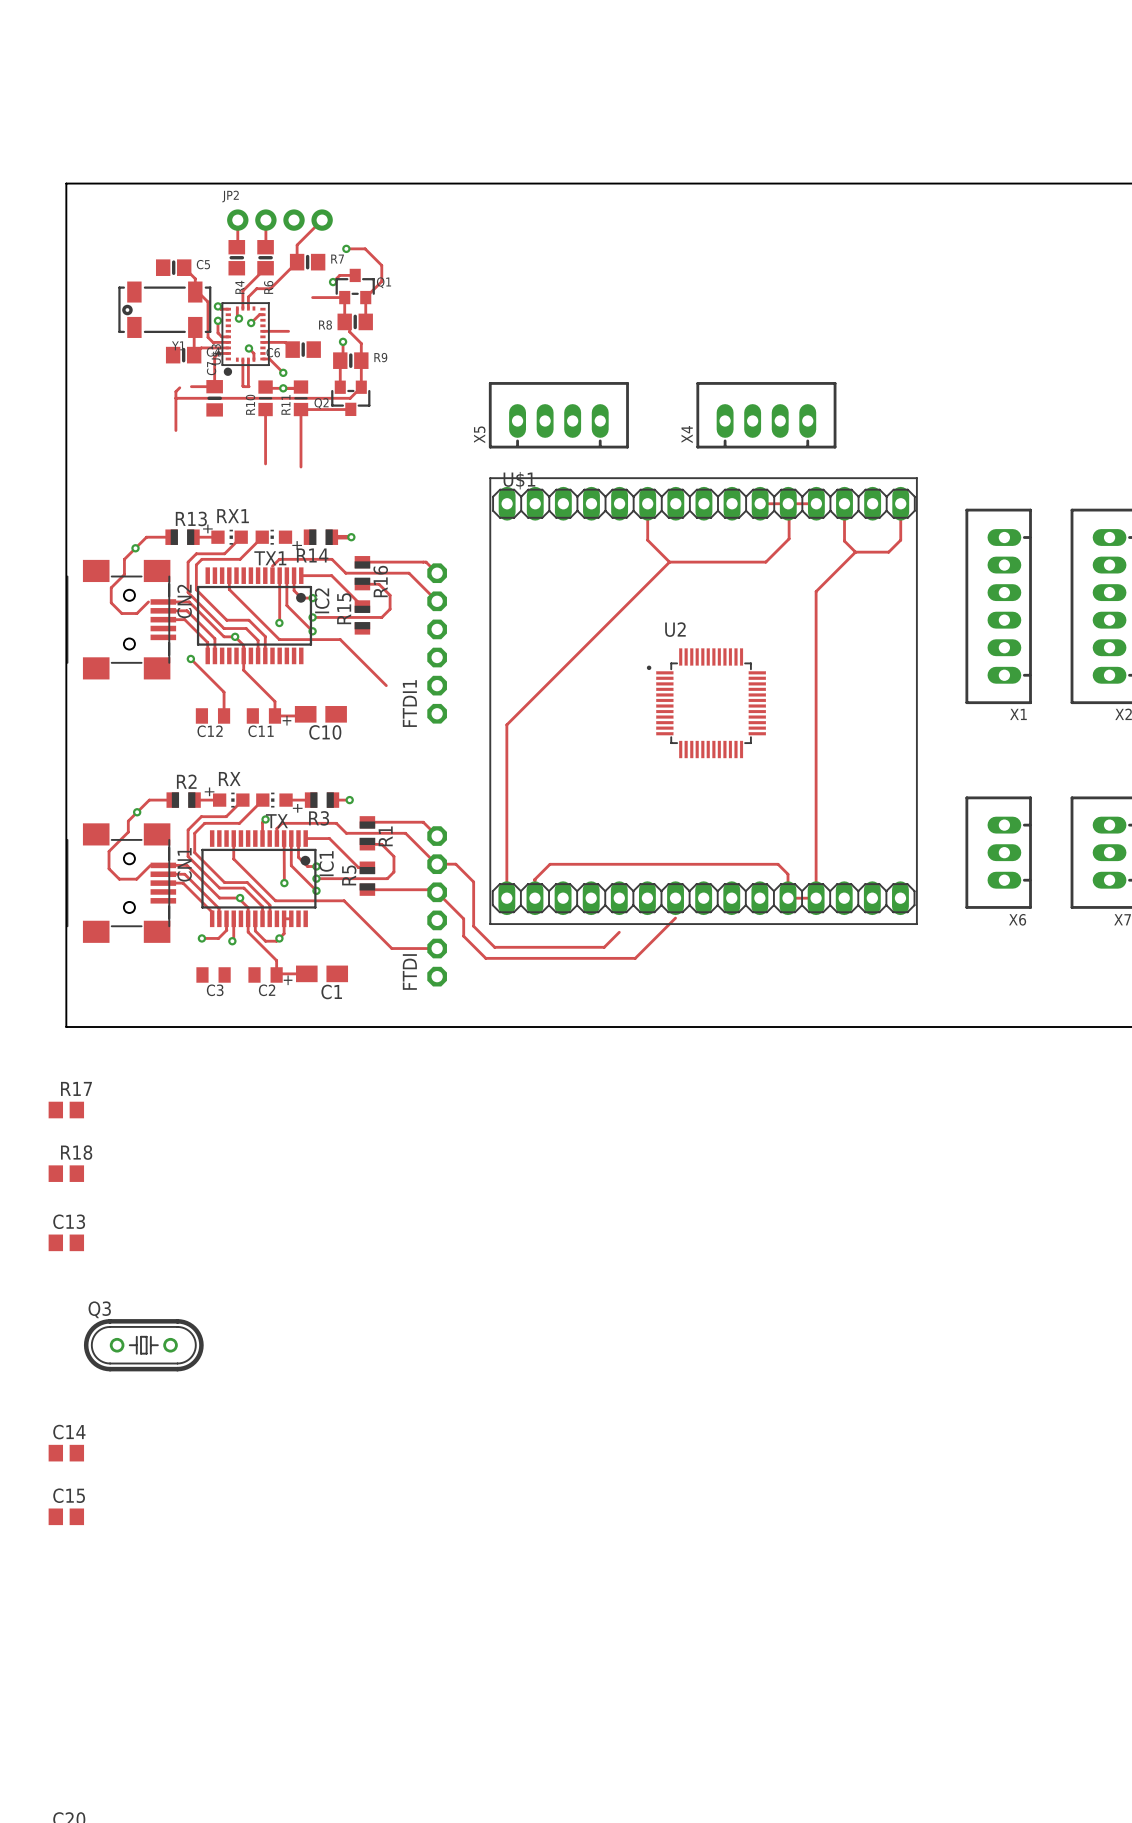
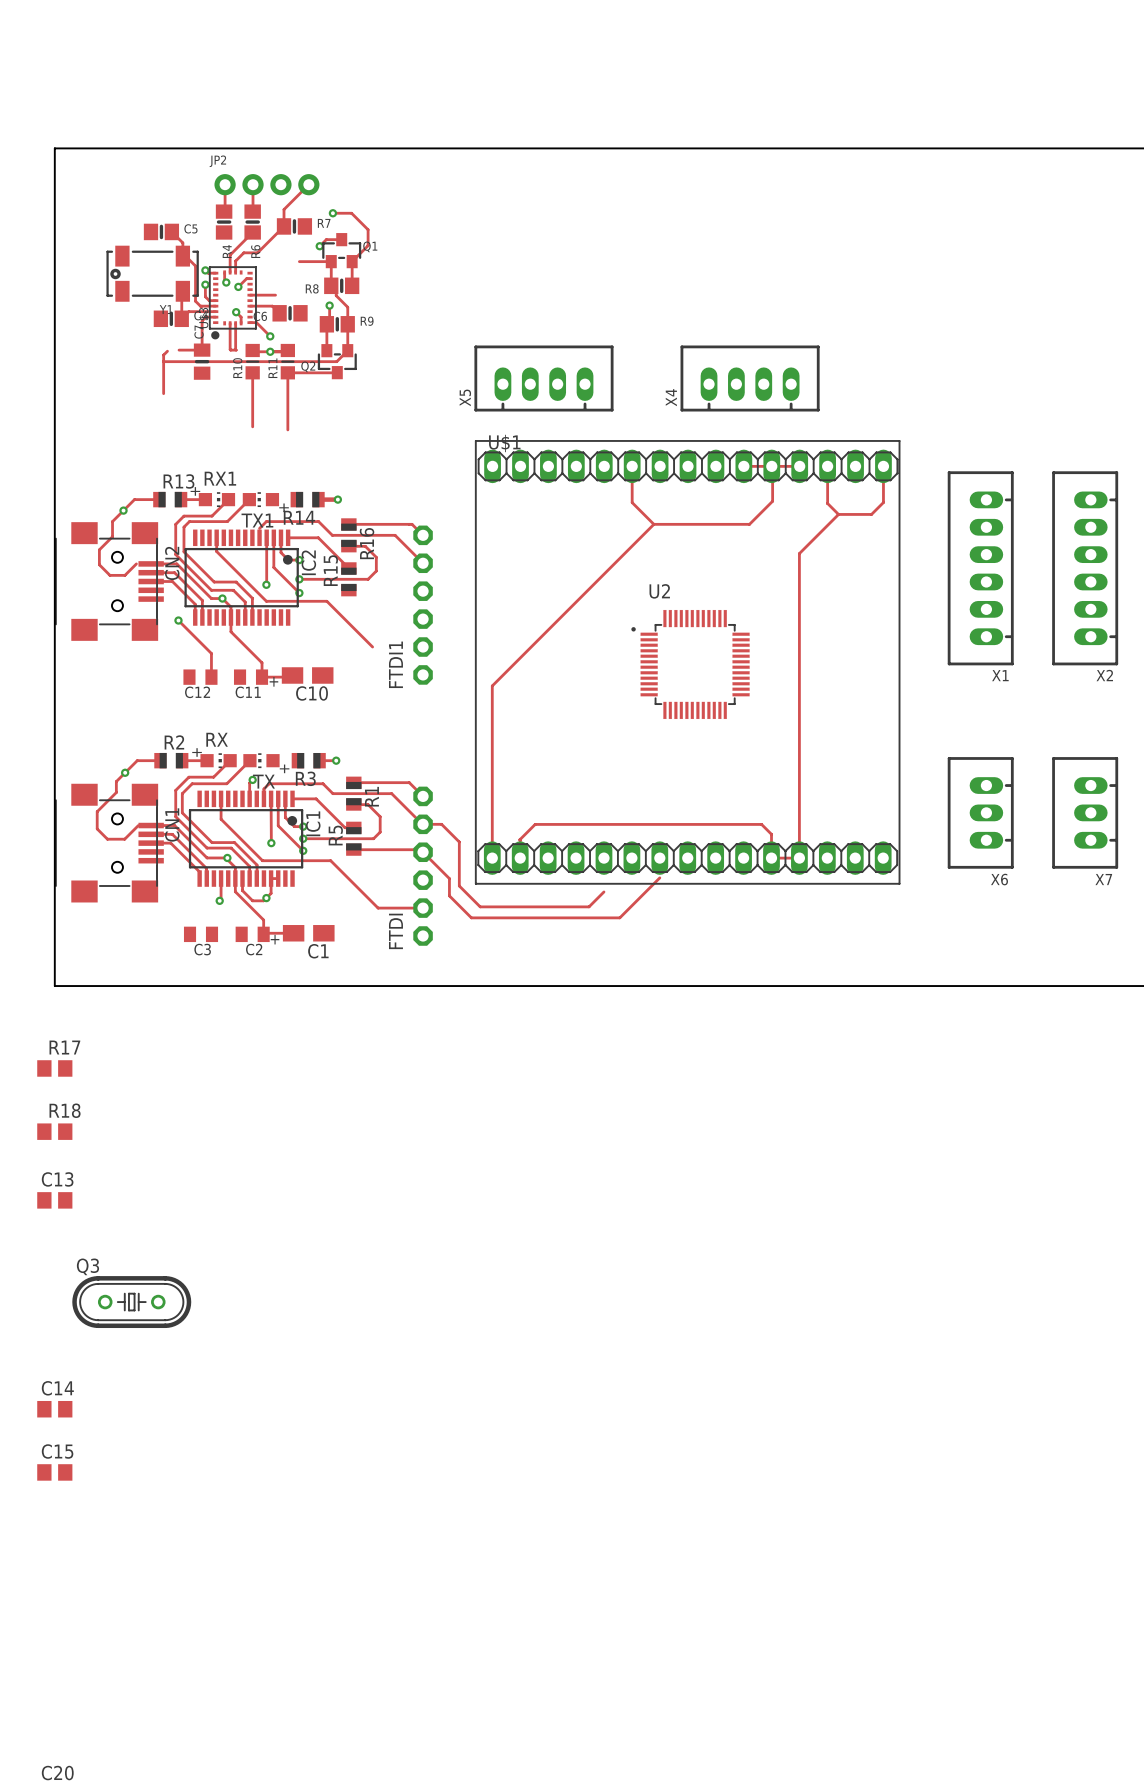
track: (286, 800) (310, 800) -> none
track: (226, 918) (226, 930) (218, 938) (201, 938) -> none
via: (201, 938) -> none

